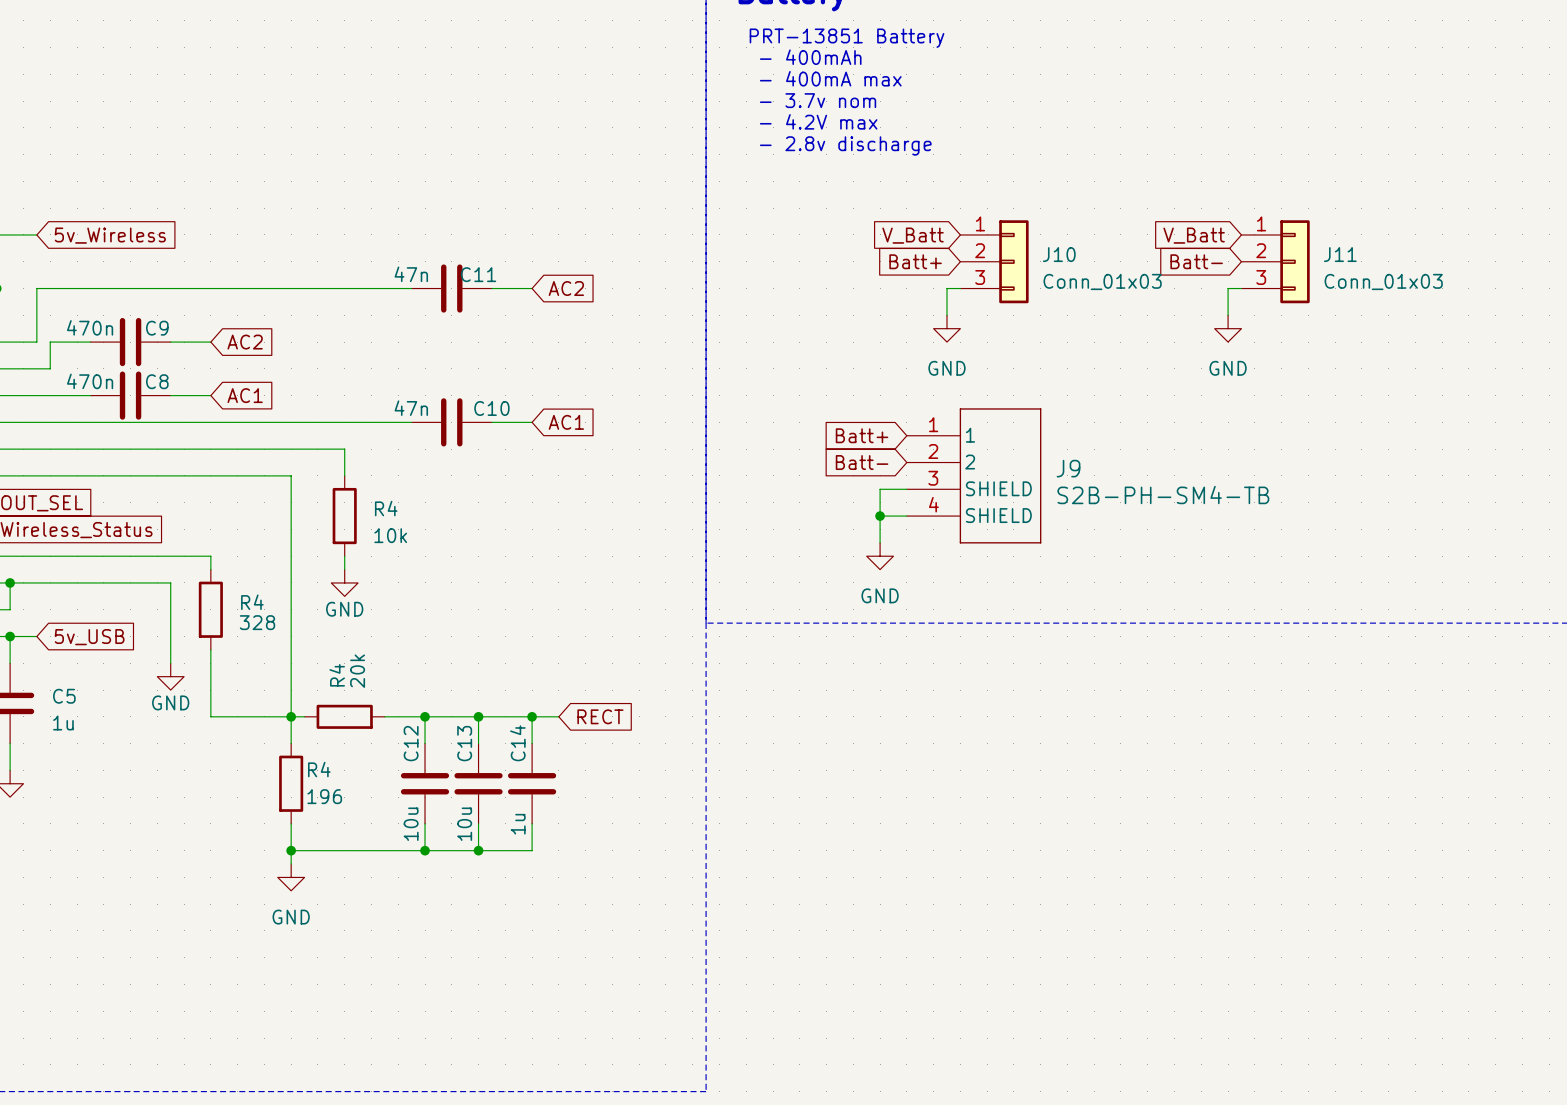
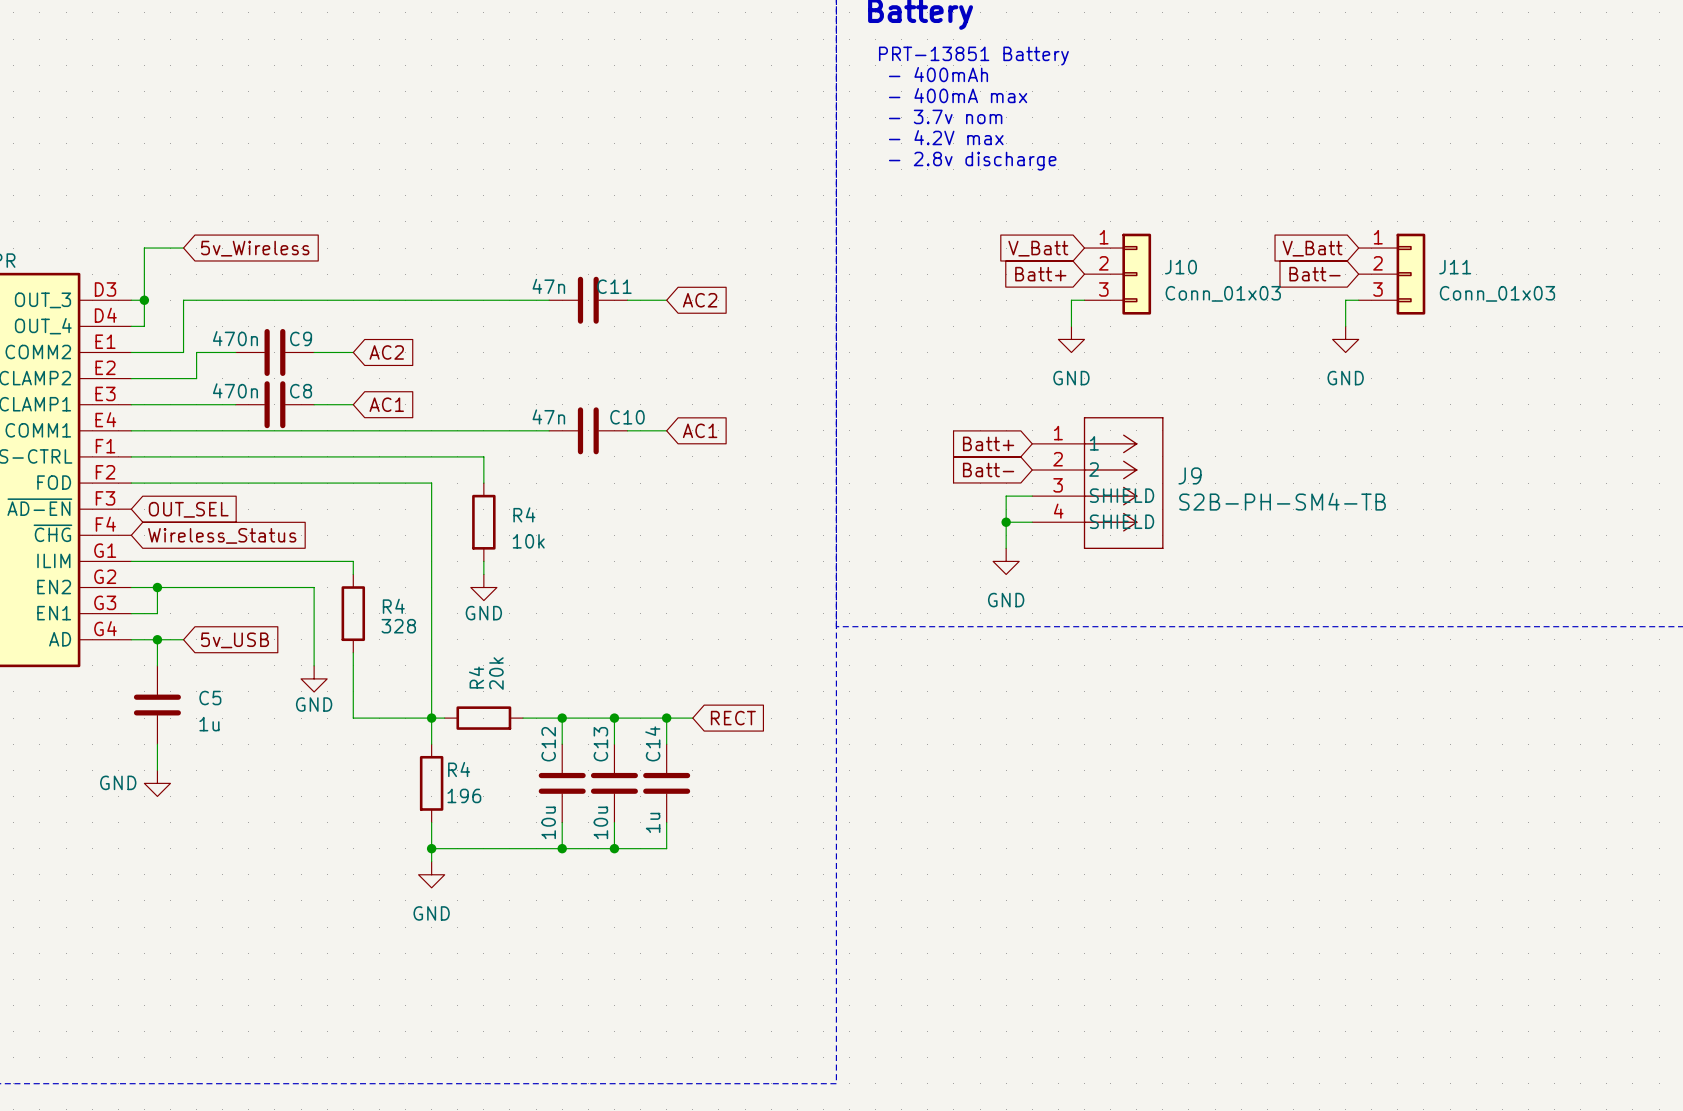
J9 symbol: [906, 408, 1042, 544] -> [1032, 417, 1164, 549]

